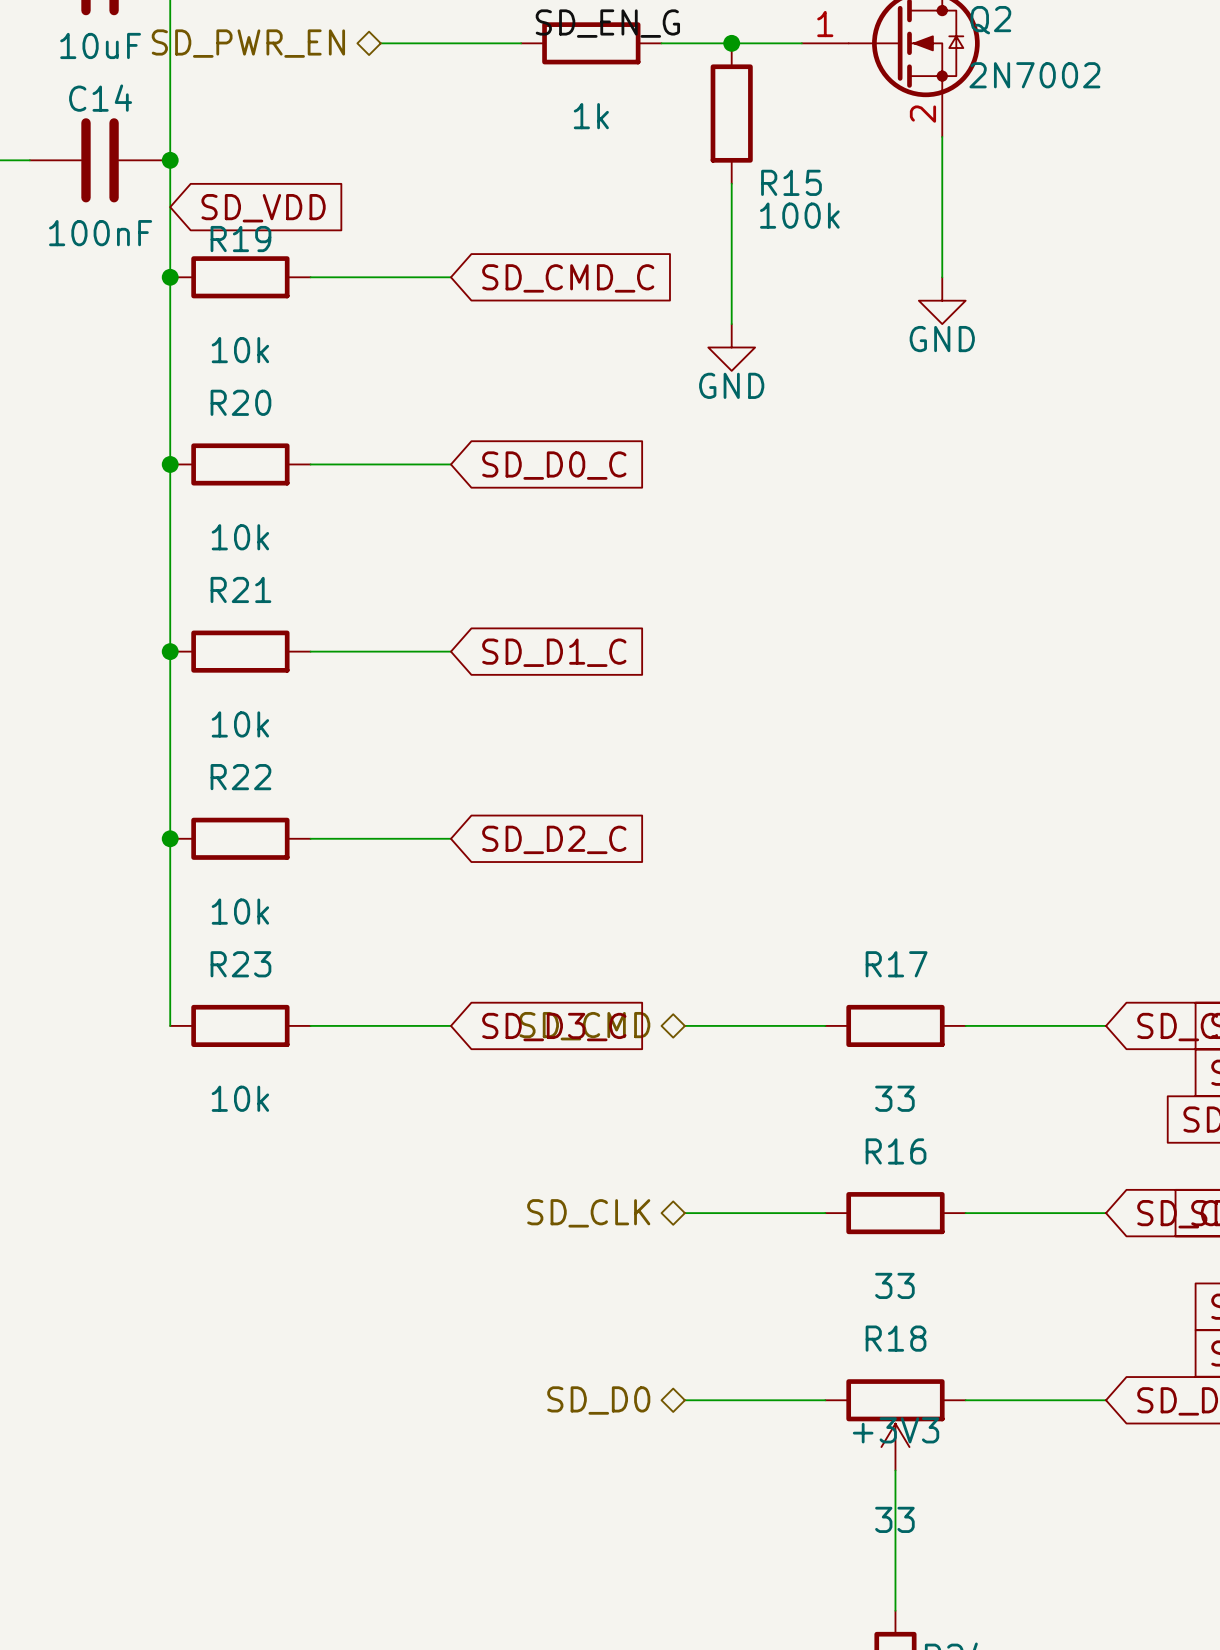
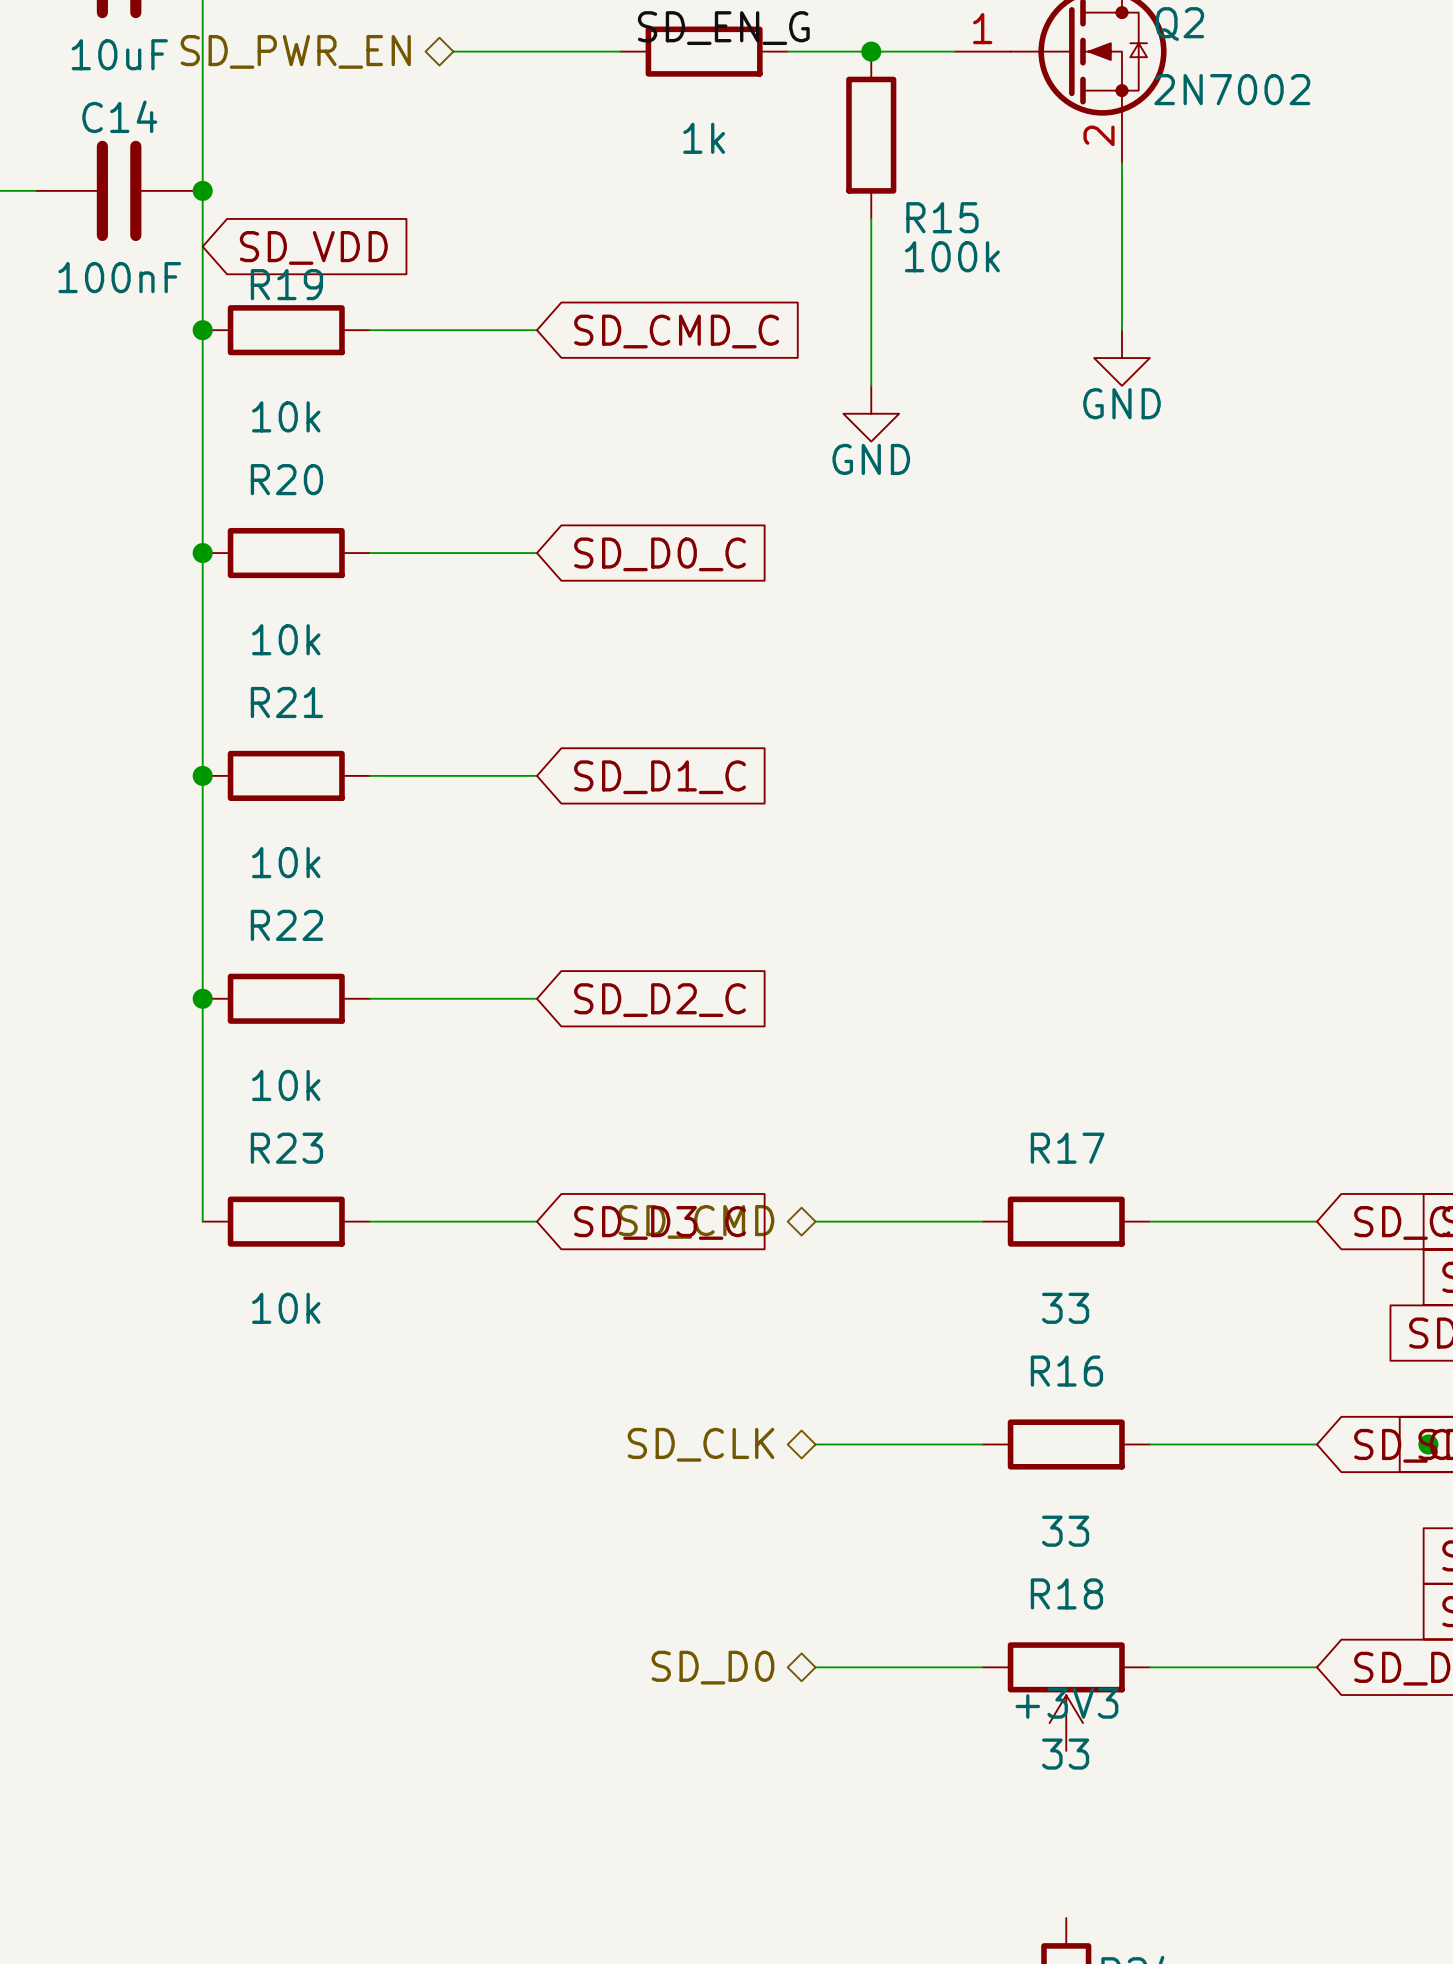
junction: none -> (1428, 1444)
wire: (895, 1470) (895, 1610) -> none
R18 value position: 33 (894, 1519) -> 33 (1065, 1754)

